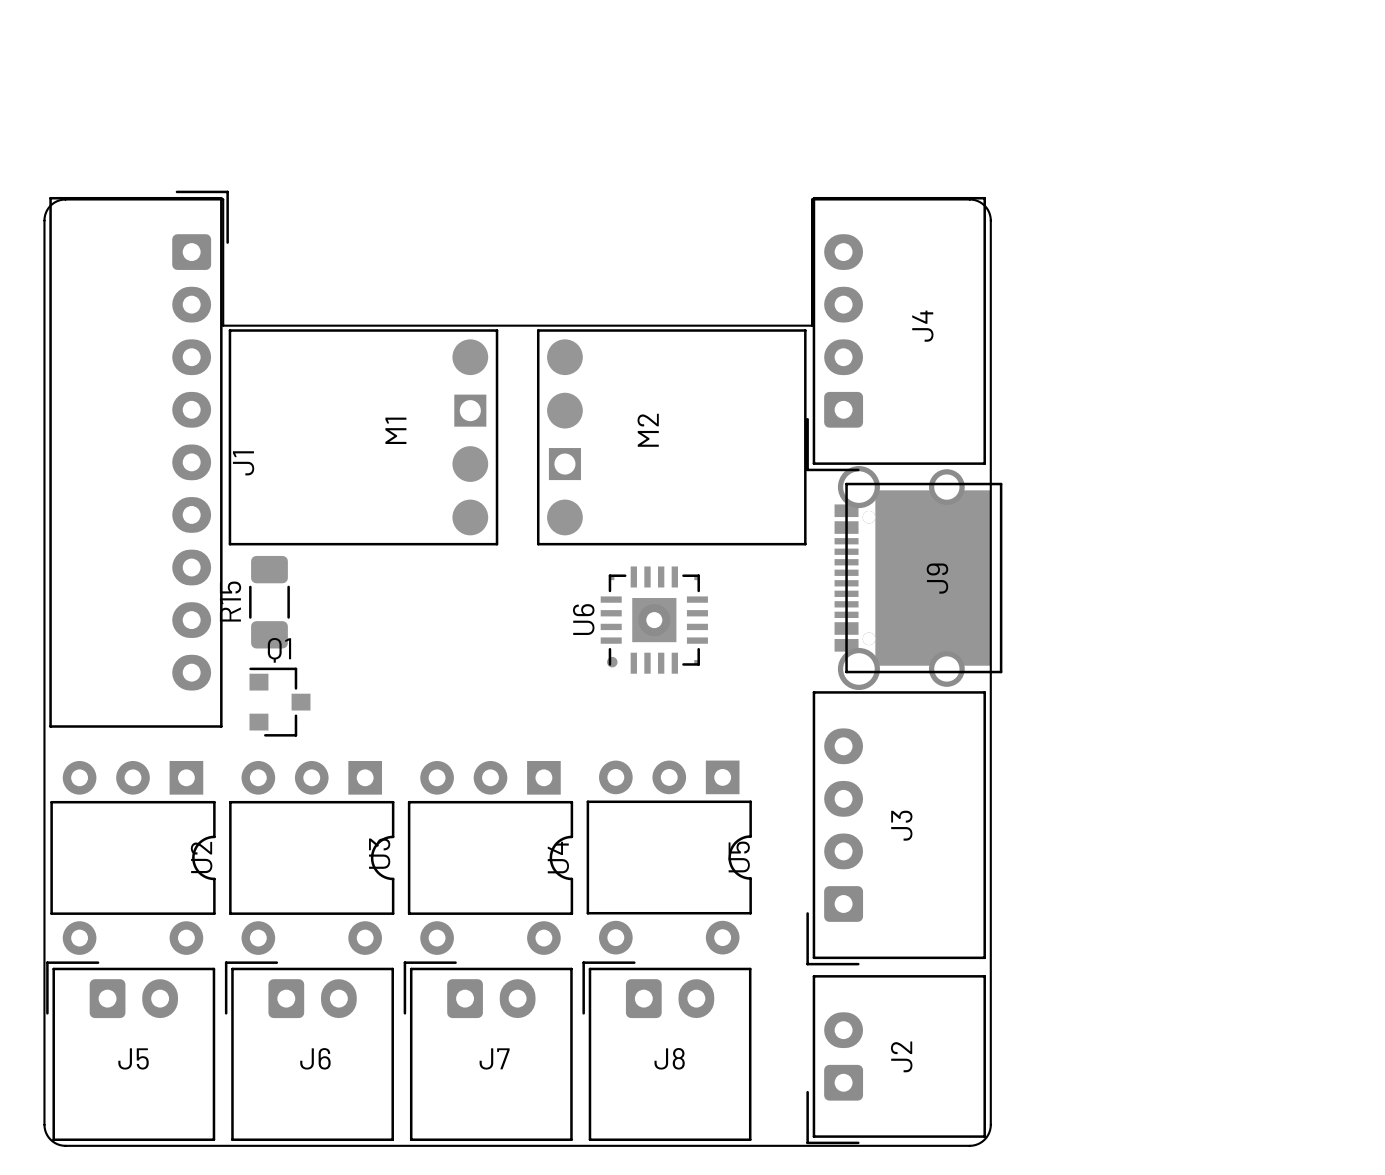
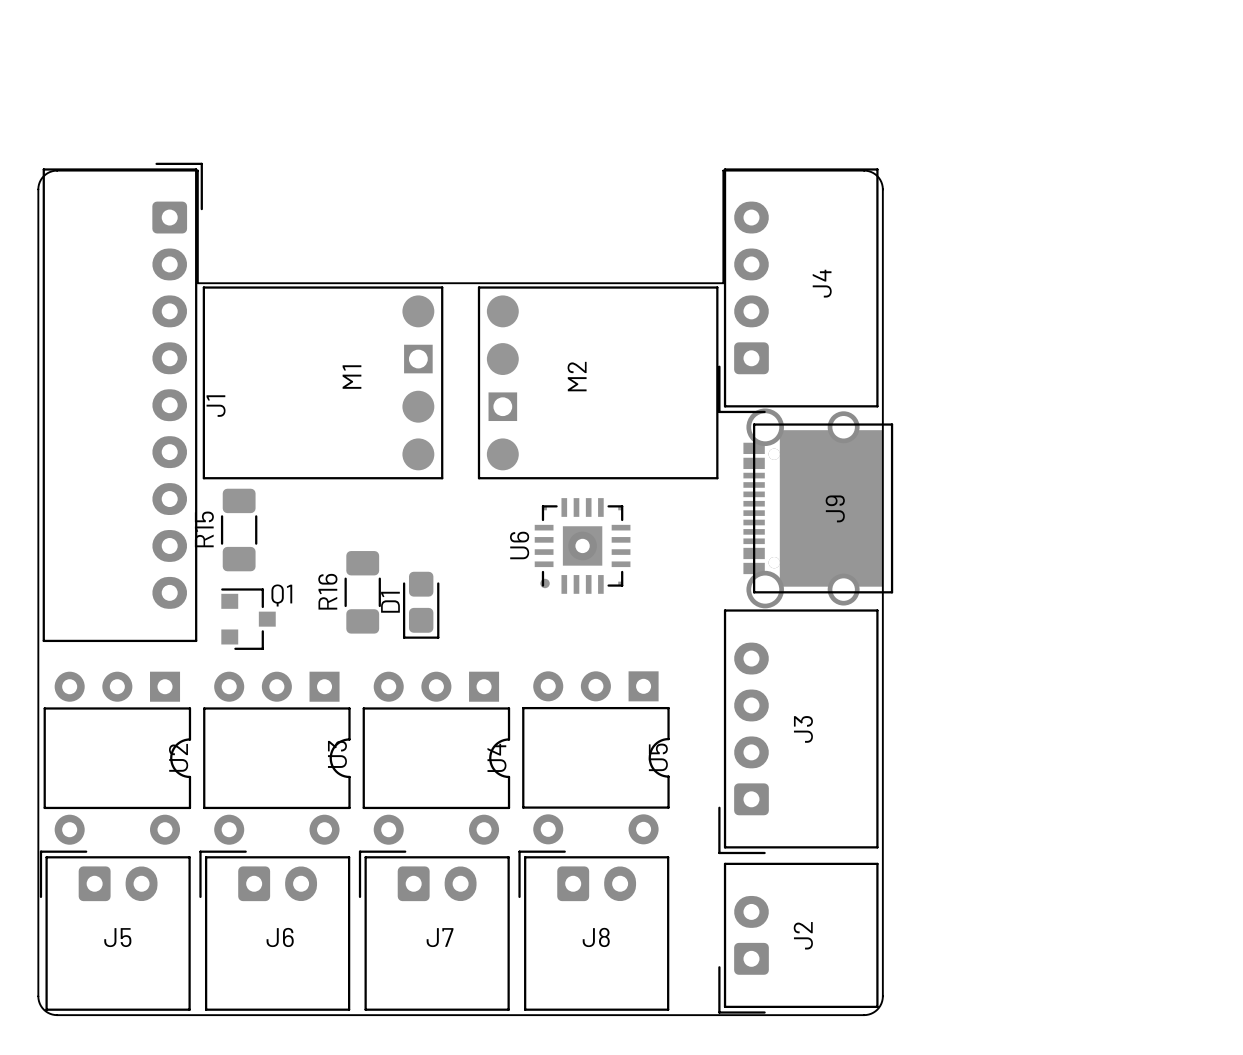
Q1 name position: Q1 (279, 650) -> Q1 (281, 595)
R16: none -> (362, 592)
D1: none -> (421, 605)

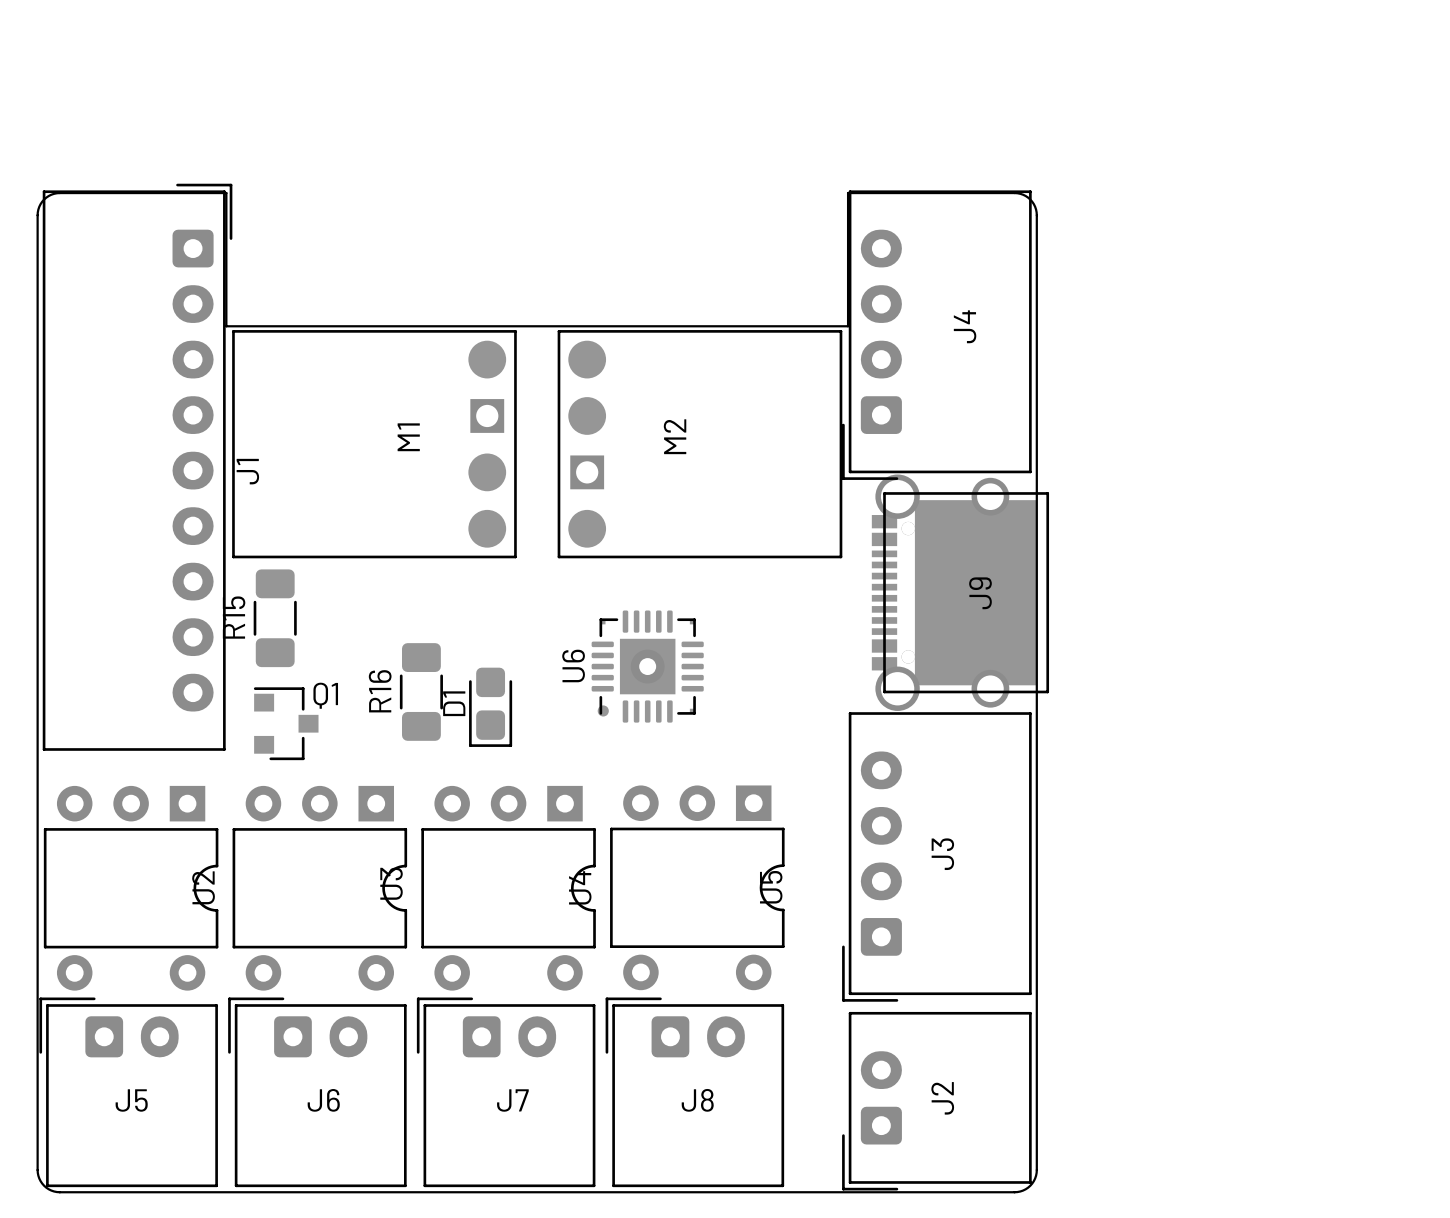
U6 footprint: [534, 498, 631, 594] -> [591, 610, 704, 723]

